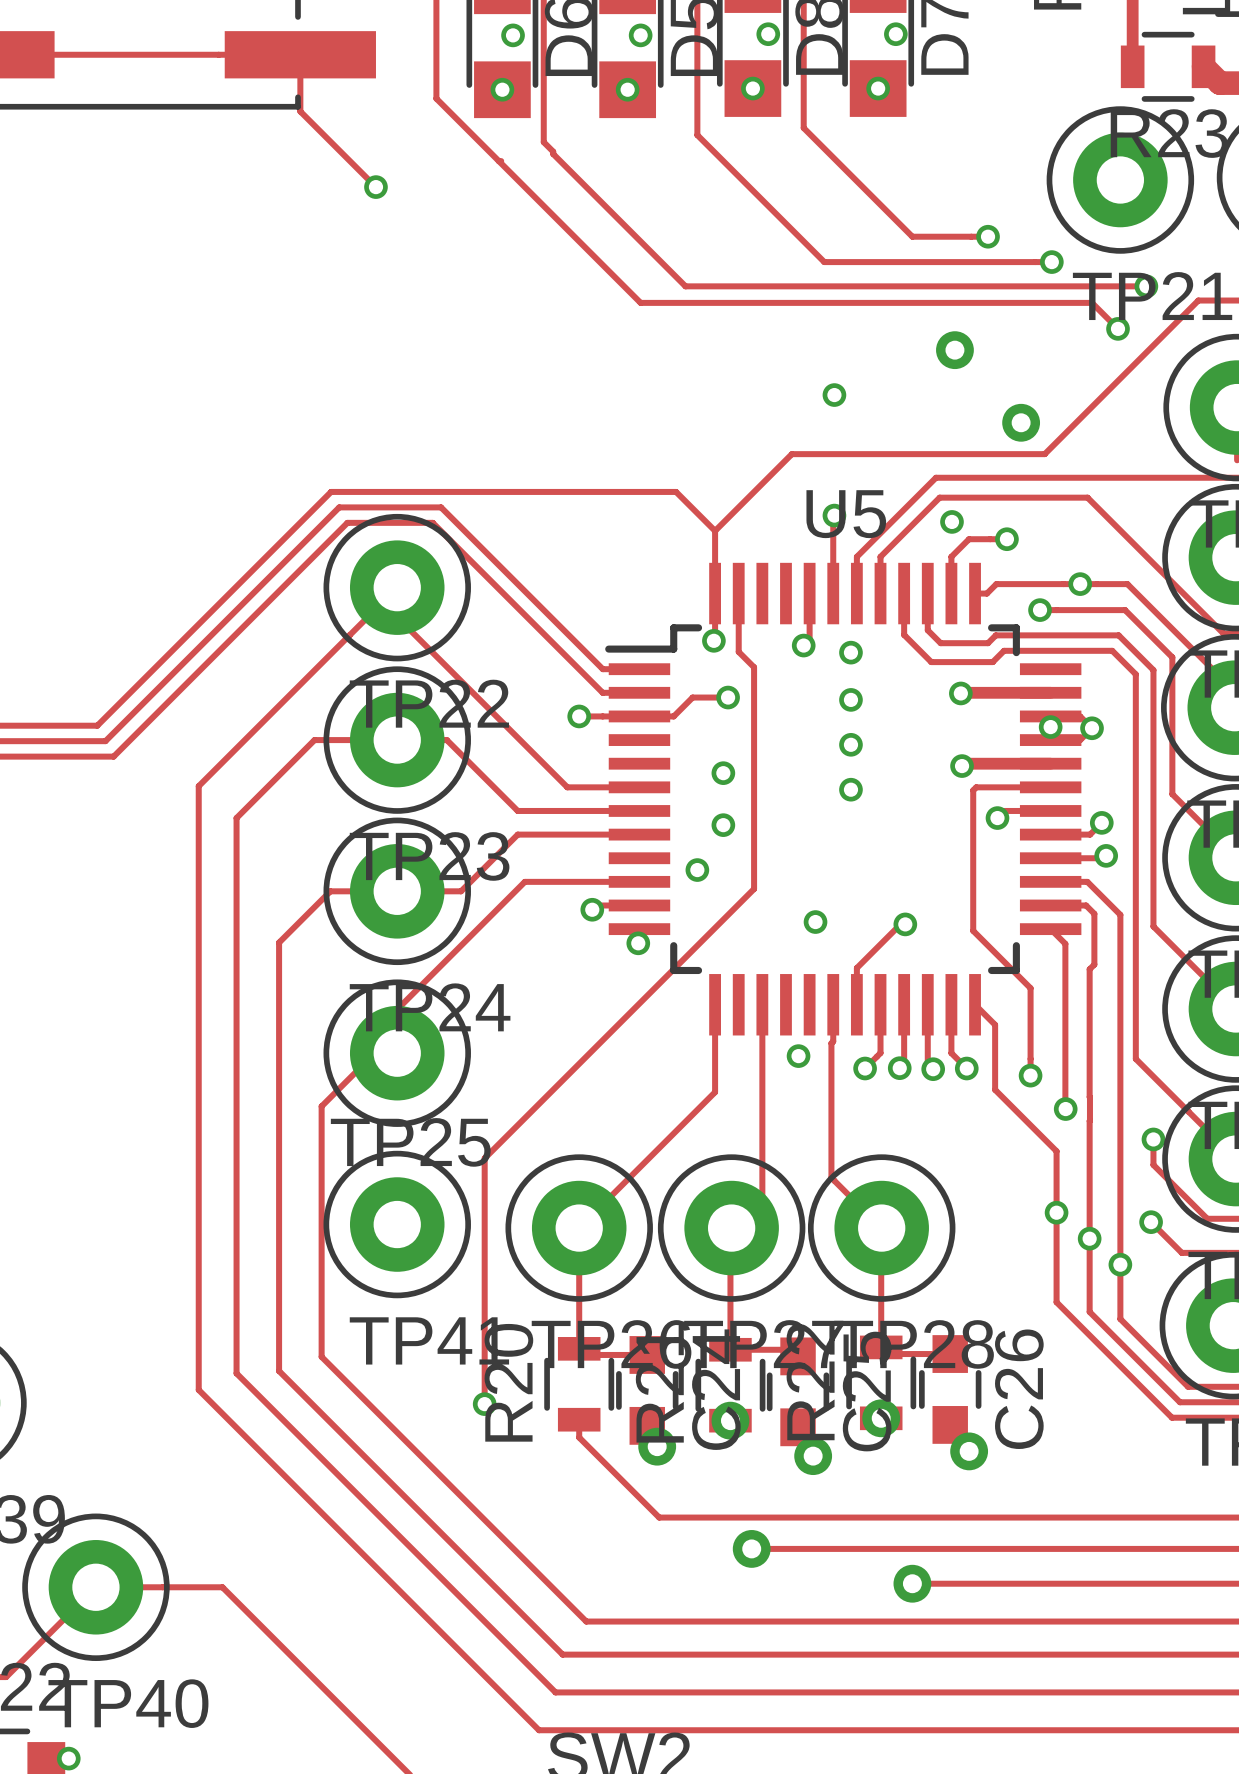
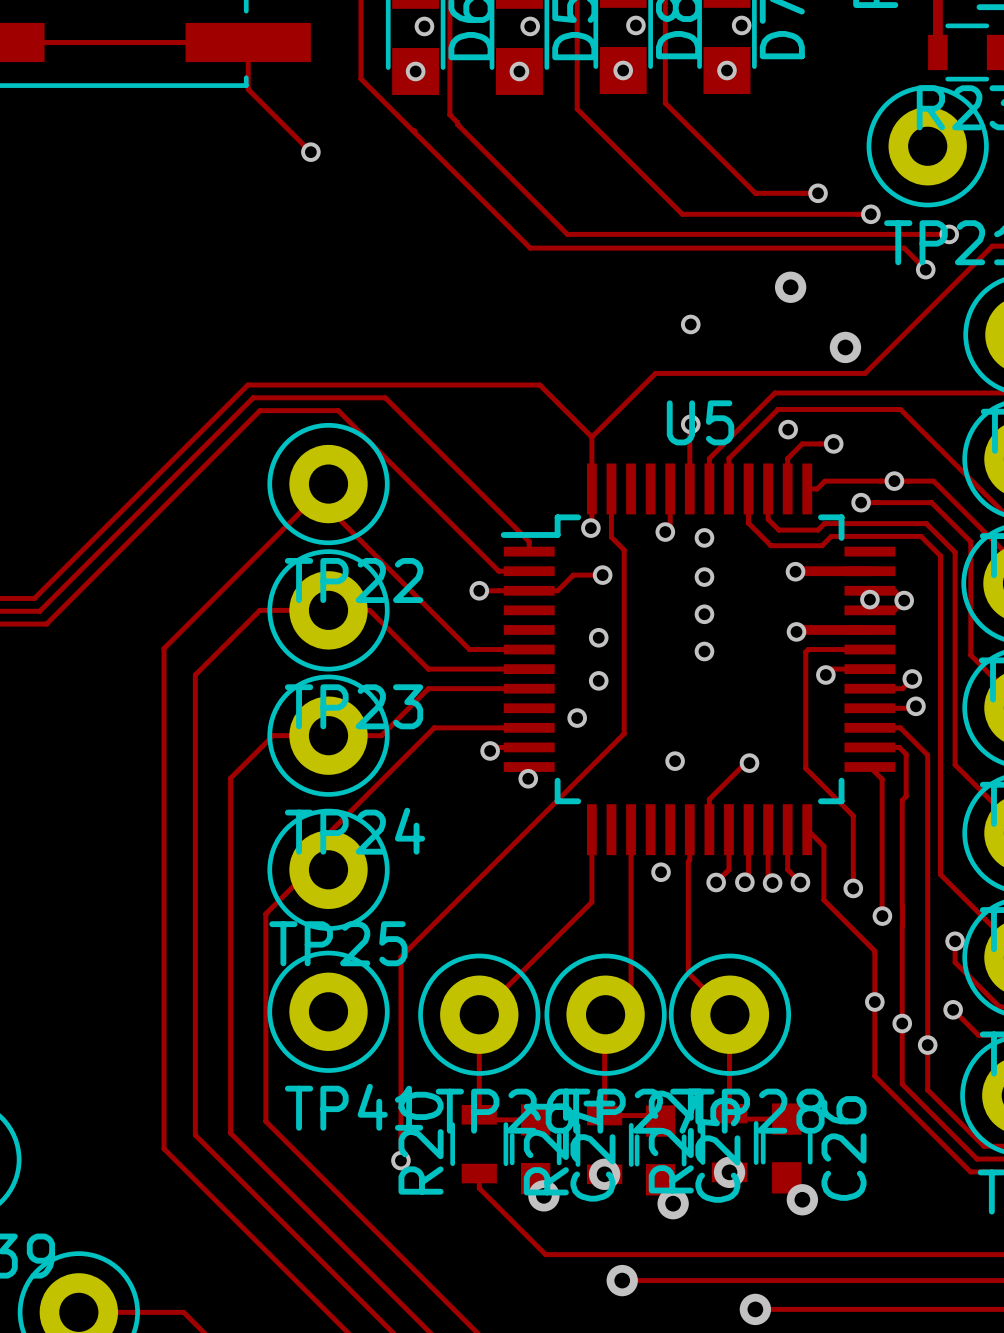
track: (676, 491) (331, 491) (97, 725) (42, 725) -> (559, 404) (539, 385) (247, 385) (34, 598)
track: (432, 522) (347, 522) (113, 756) (56, 756) -> (357, 430) (338, 410) (259, 410) (46, 624)
track: (639, 669) (602, 669) (441, 507) (339, 507) (105, 741) (48, 741) -> (529, 551) (529, 541) (385, 397) (253, 397) (39, 611)

